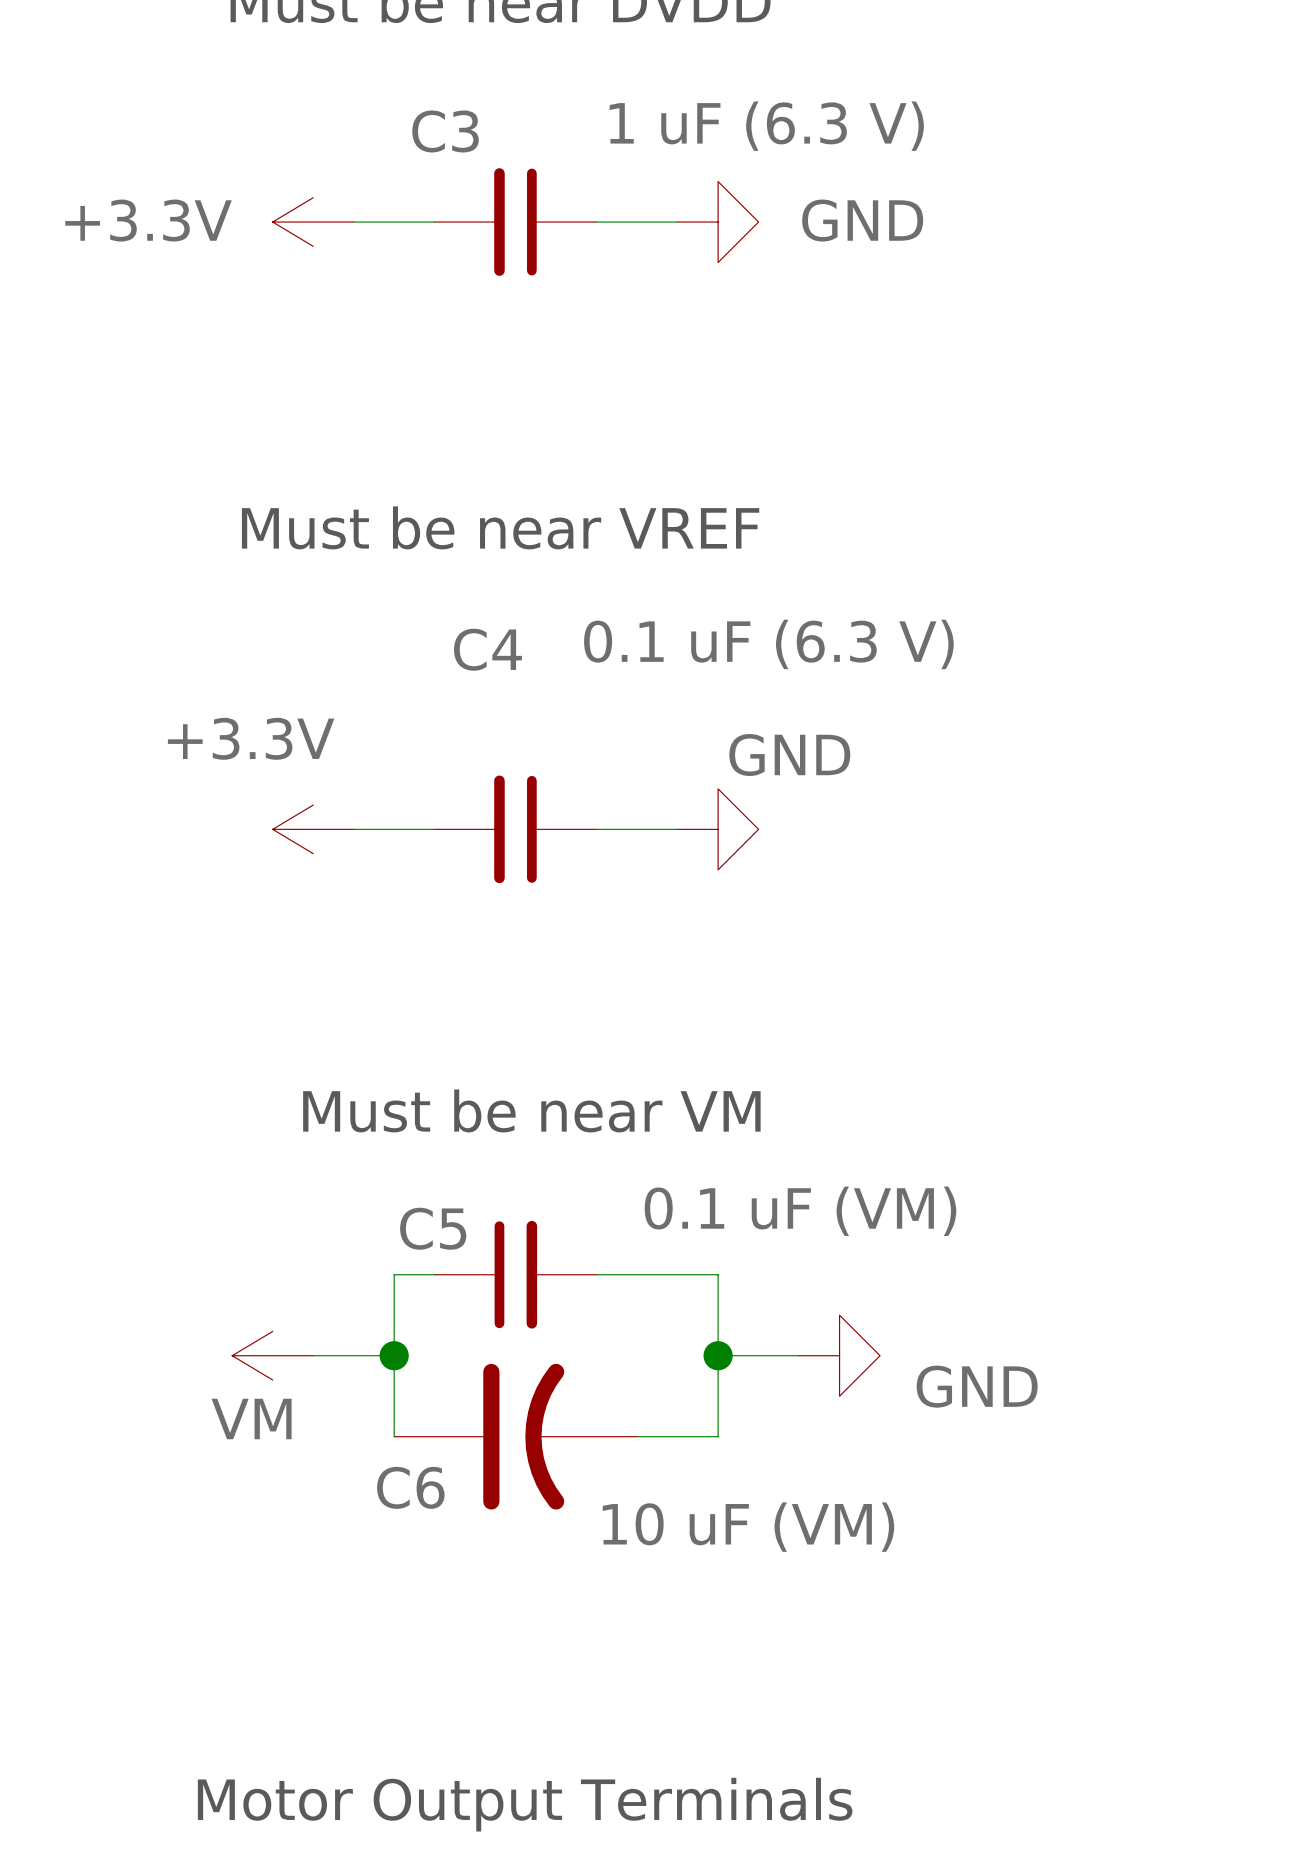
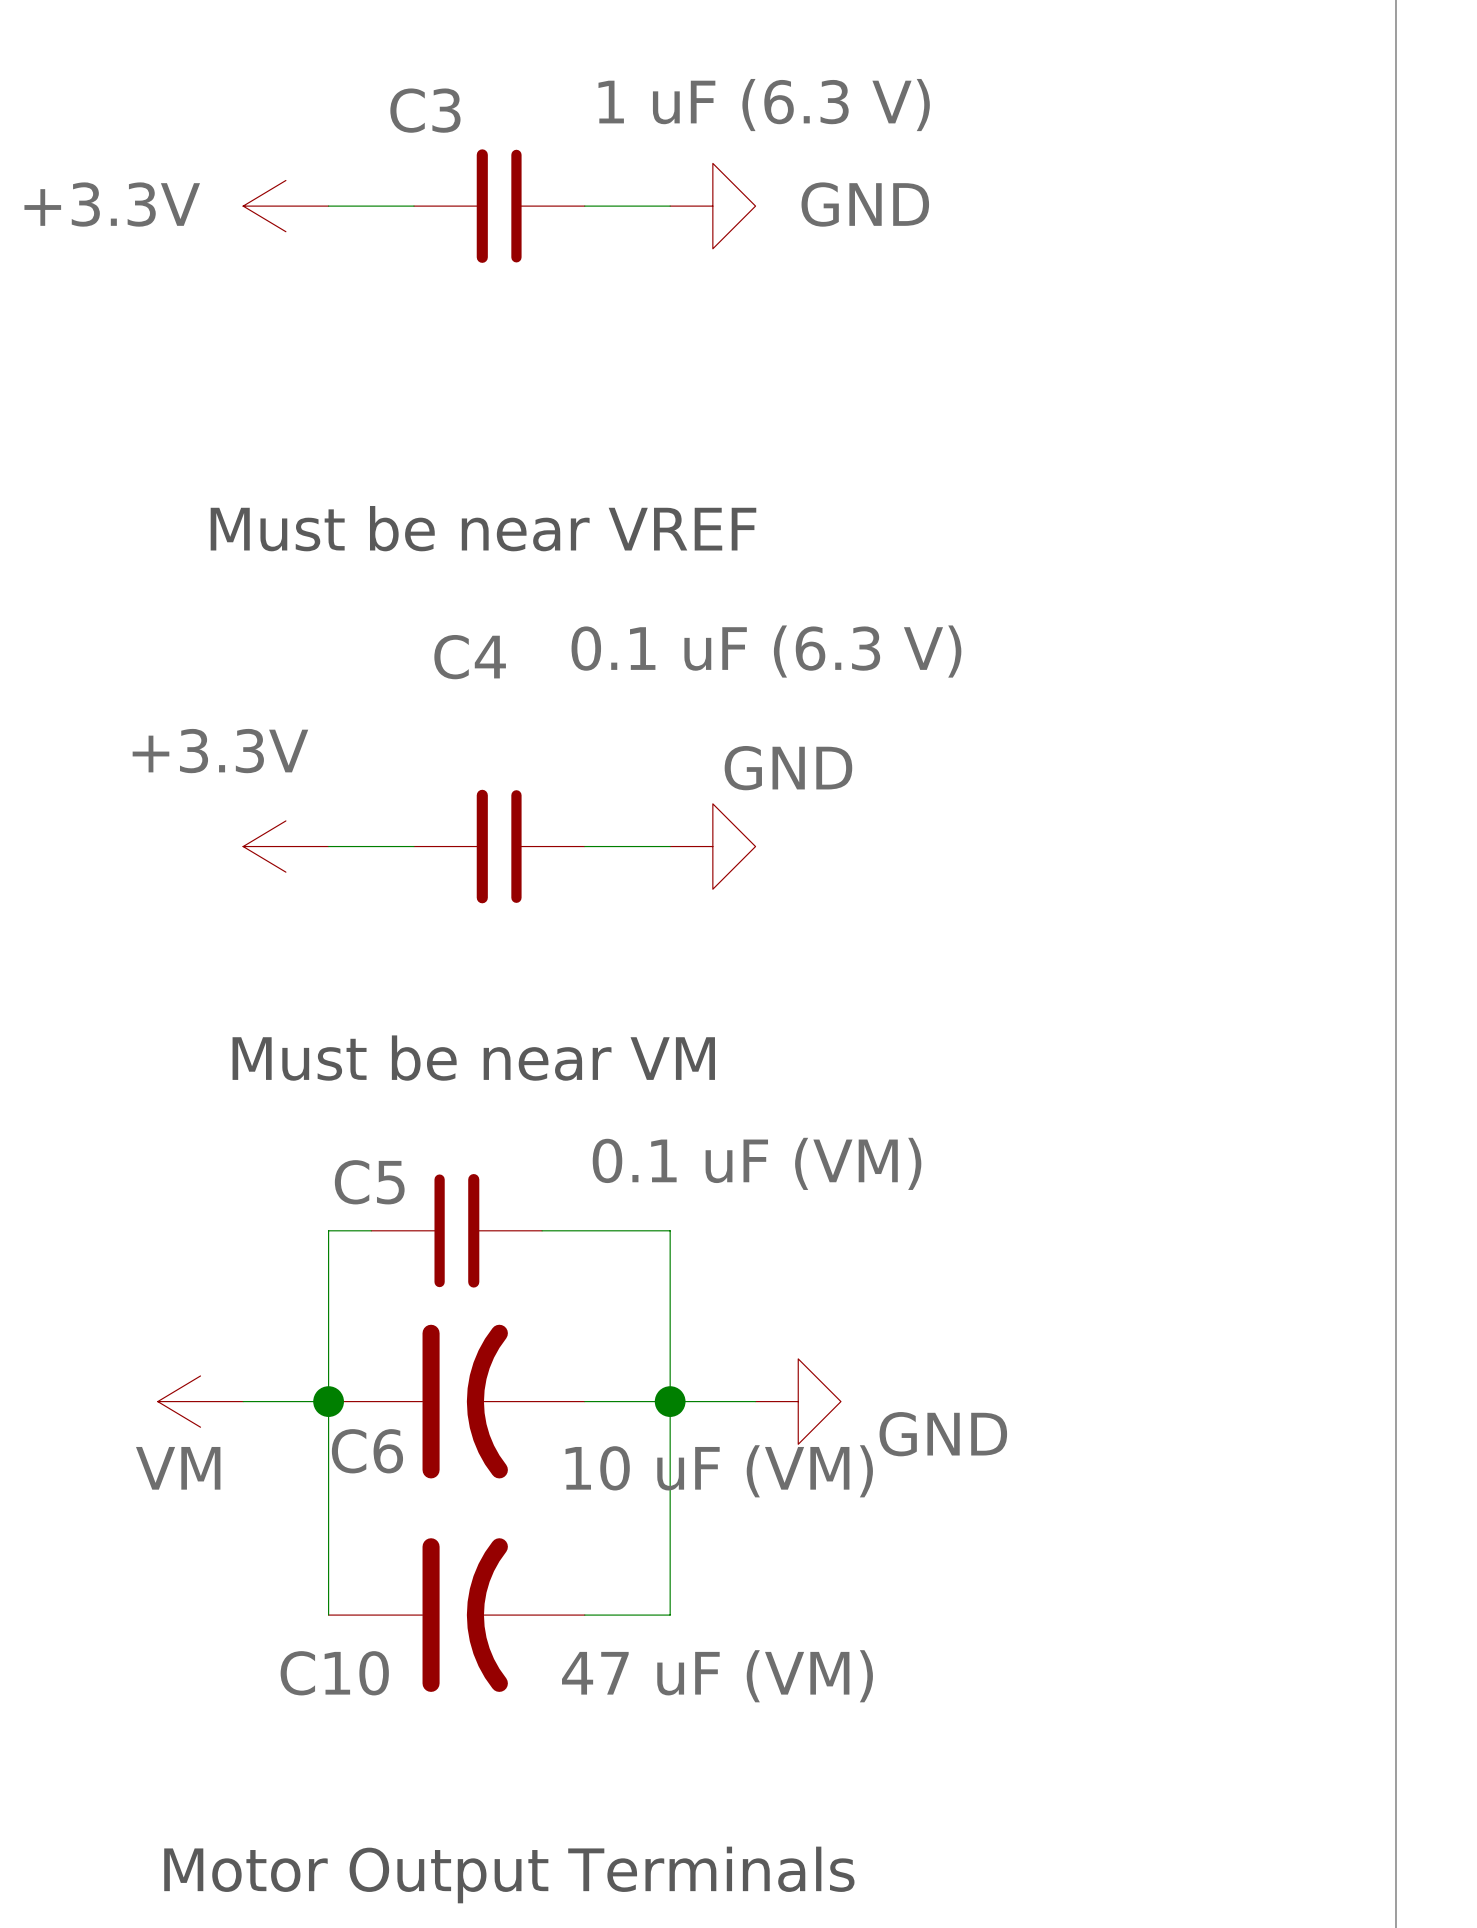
text position: Must be near VM (531, 1110) -> Must be near VM (473, 1058)
wire: none -> (371, 1230) (328, 1230) (328, 1615)
wire: none -> (542, 1230) (670, 1230) (670, 1615) (584, 1615)
wire: (434, 1274) (394, 1274) (394, 1436) -> none
C5 position: (515, 1274) -> (456, 1230)
wire: (596, 1274) (718, 1274) (718, 1436) (637, 1436) -> none
power symbol position: VM (272, 1355) -> VM (200, 1401)
junction position: (394, 1355) -> (328, 1401)
wire: none -> (584, 1401) (712, 1401)
junction position: (718, 1355) -> (670, 1401)
power symbol position: GND (839, 1355) -> GND (798, 1401)
C6 position: (515, 1436) -> (456, 1401)
C6 name position: C6 (410, 1487) -> C6 (367, 1451)
C6 value position: 10 uF (VM) (748, 1527) -> 10 uF (VM) (719, 1471)
C10: none -> 47 uF (VM) (456, 1615)

